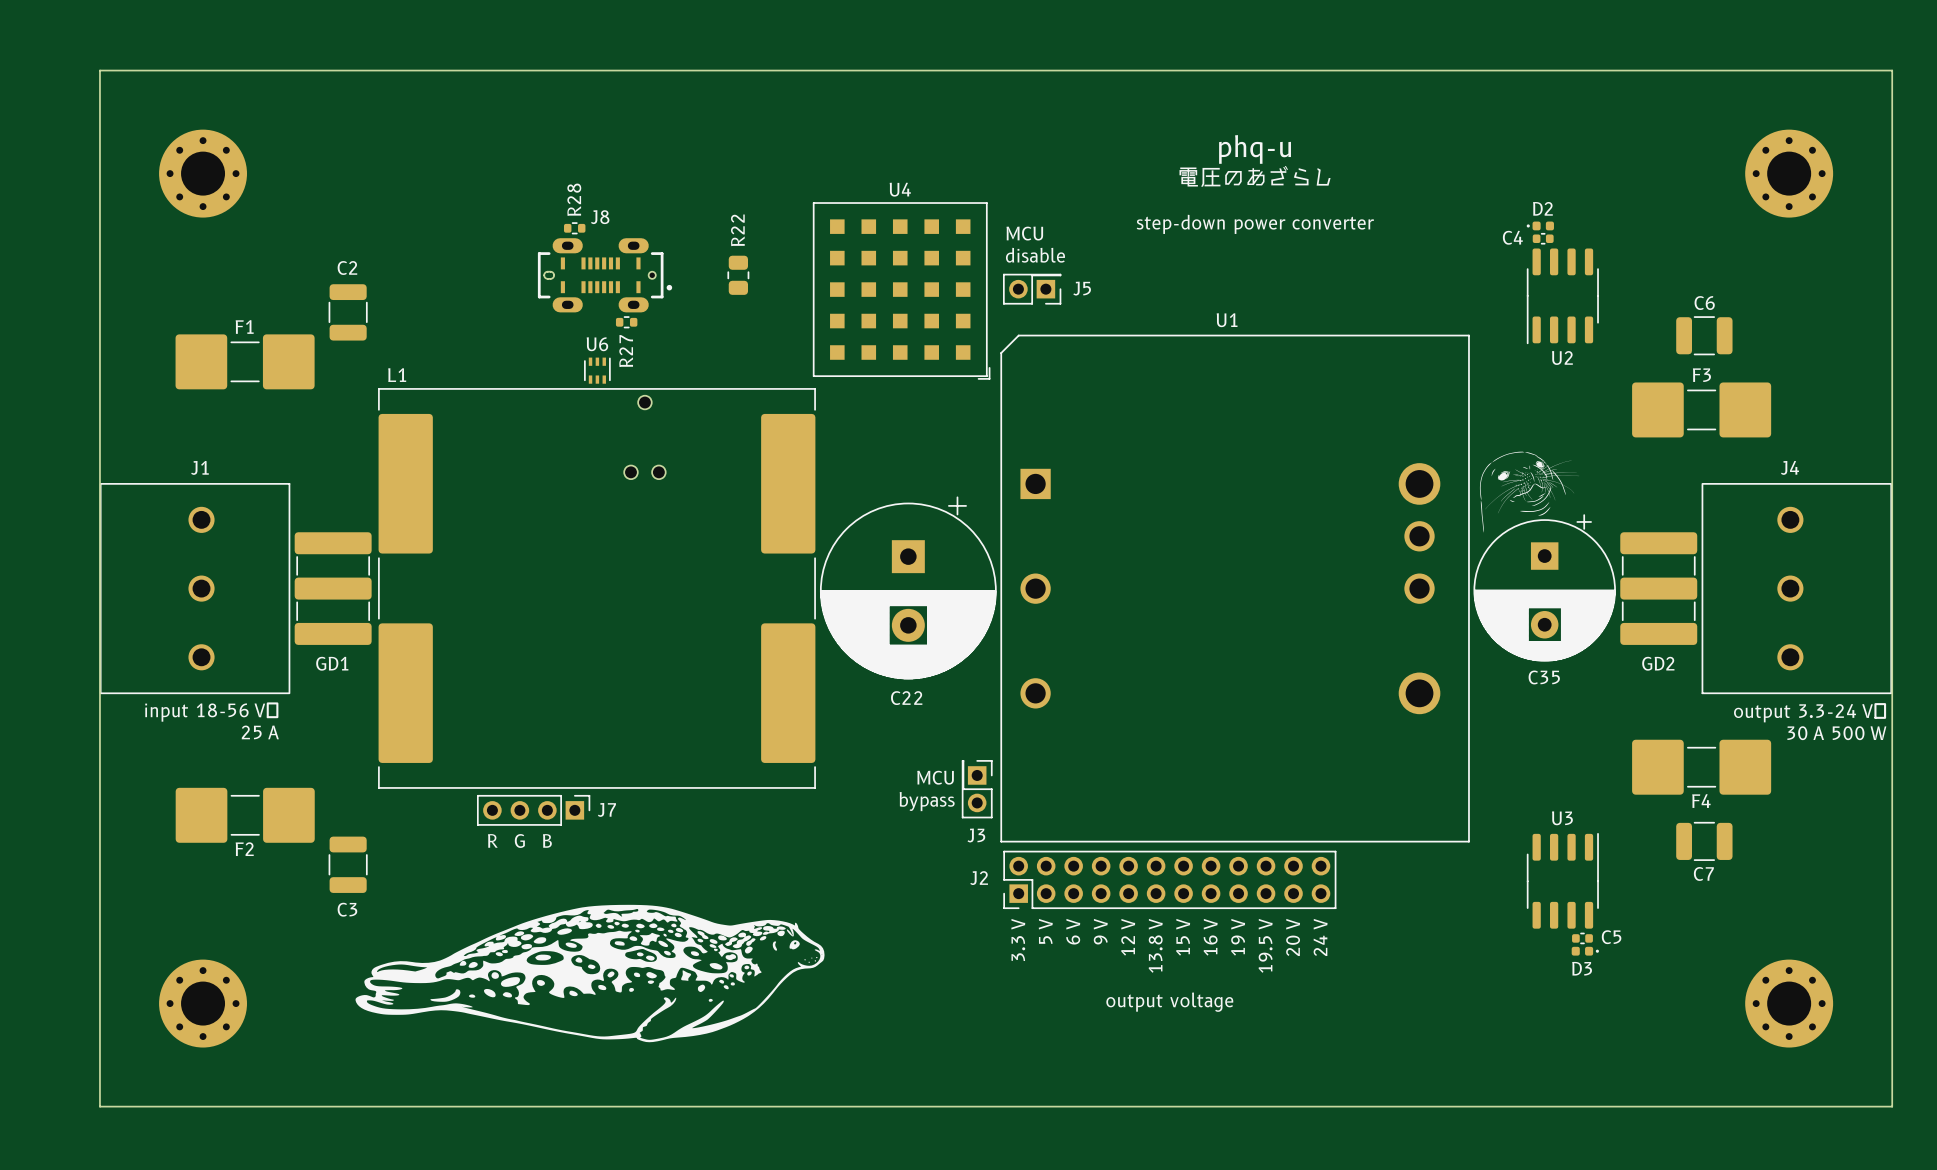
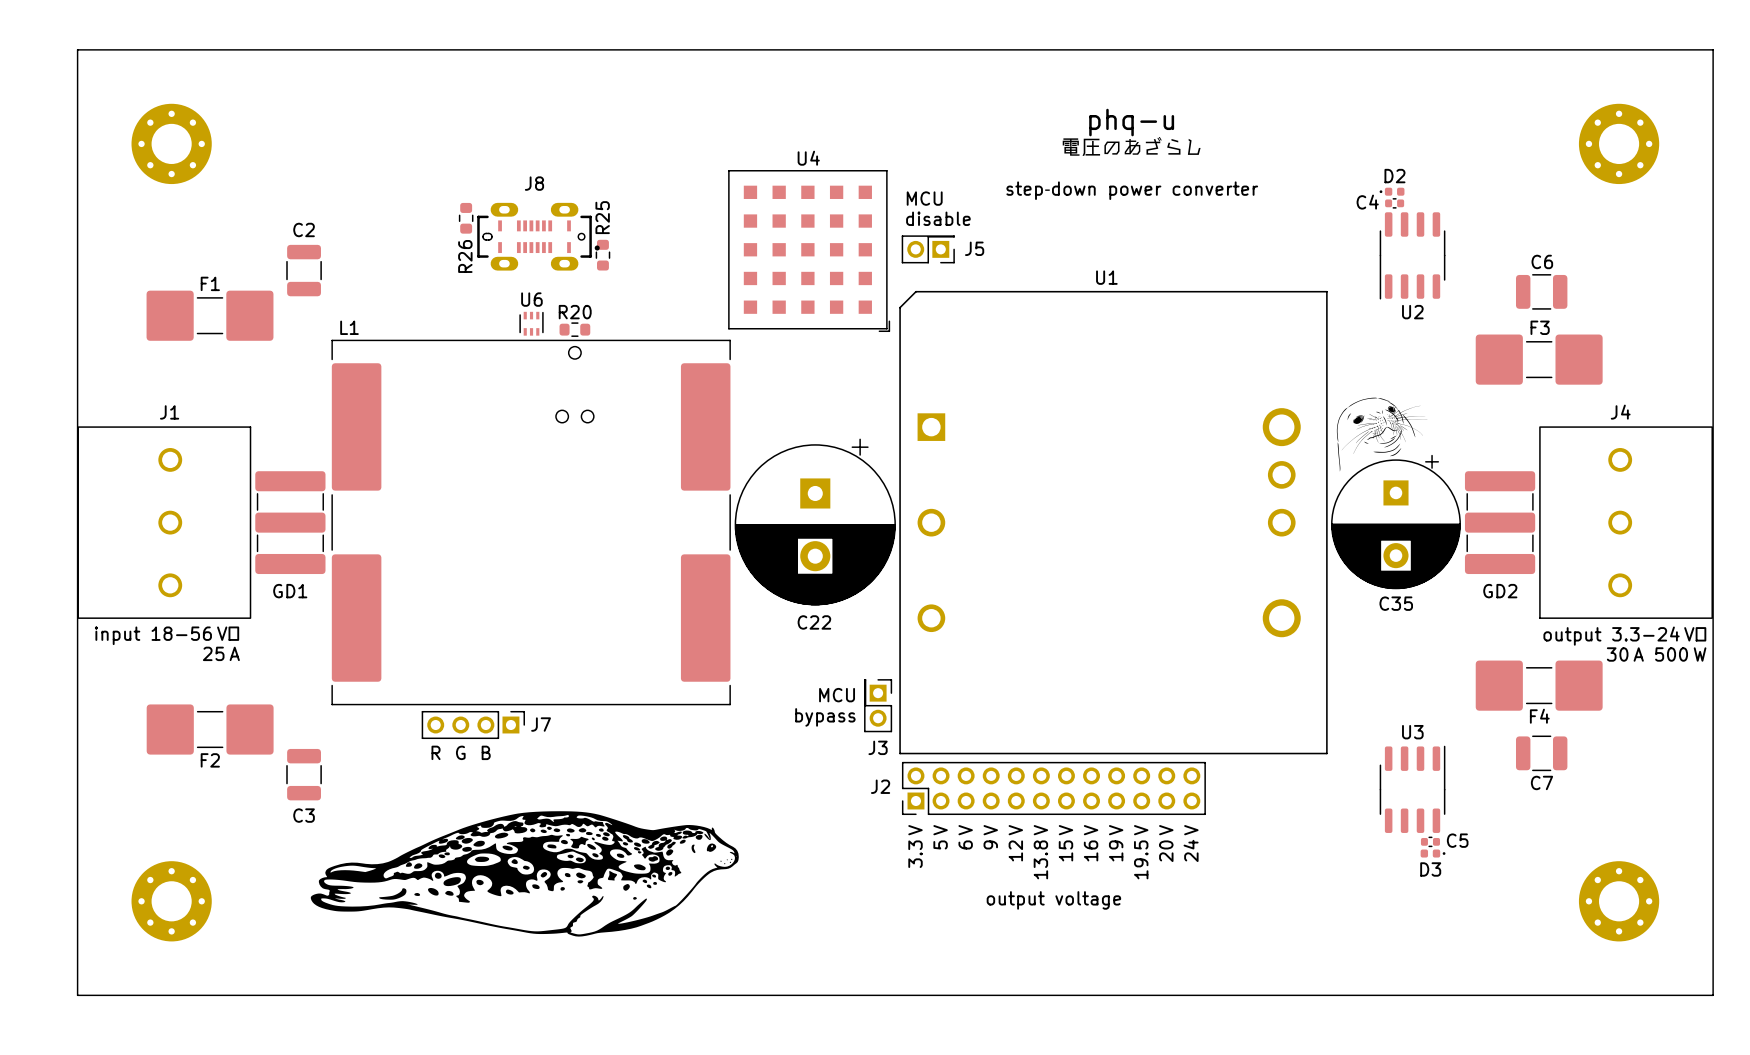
R28: (574, 228) -> none
R26: none -> (466, 218)
R22: (738, 275) -> none
R25: none -> (602, 255)
R27: (626, 322) -> none
R20: none -> (574, 329)

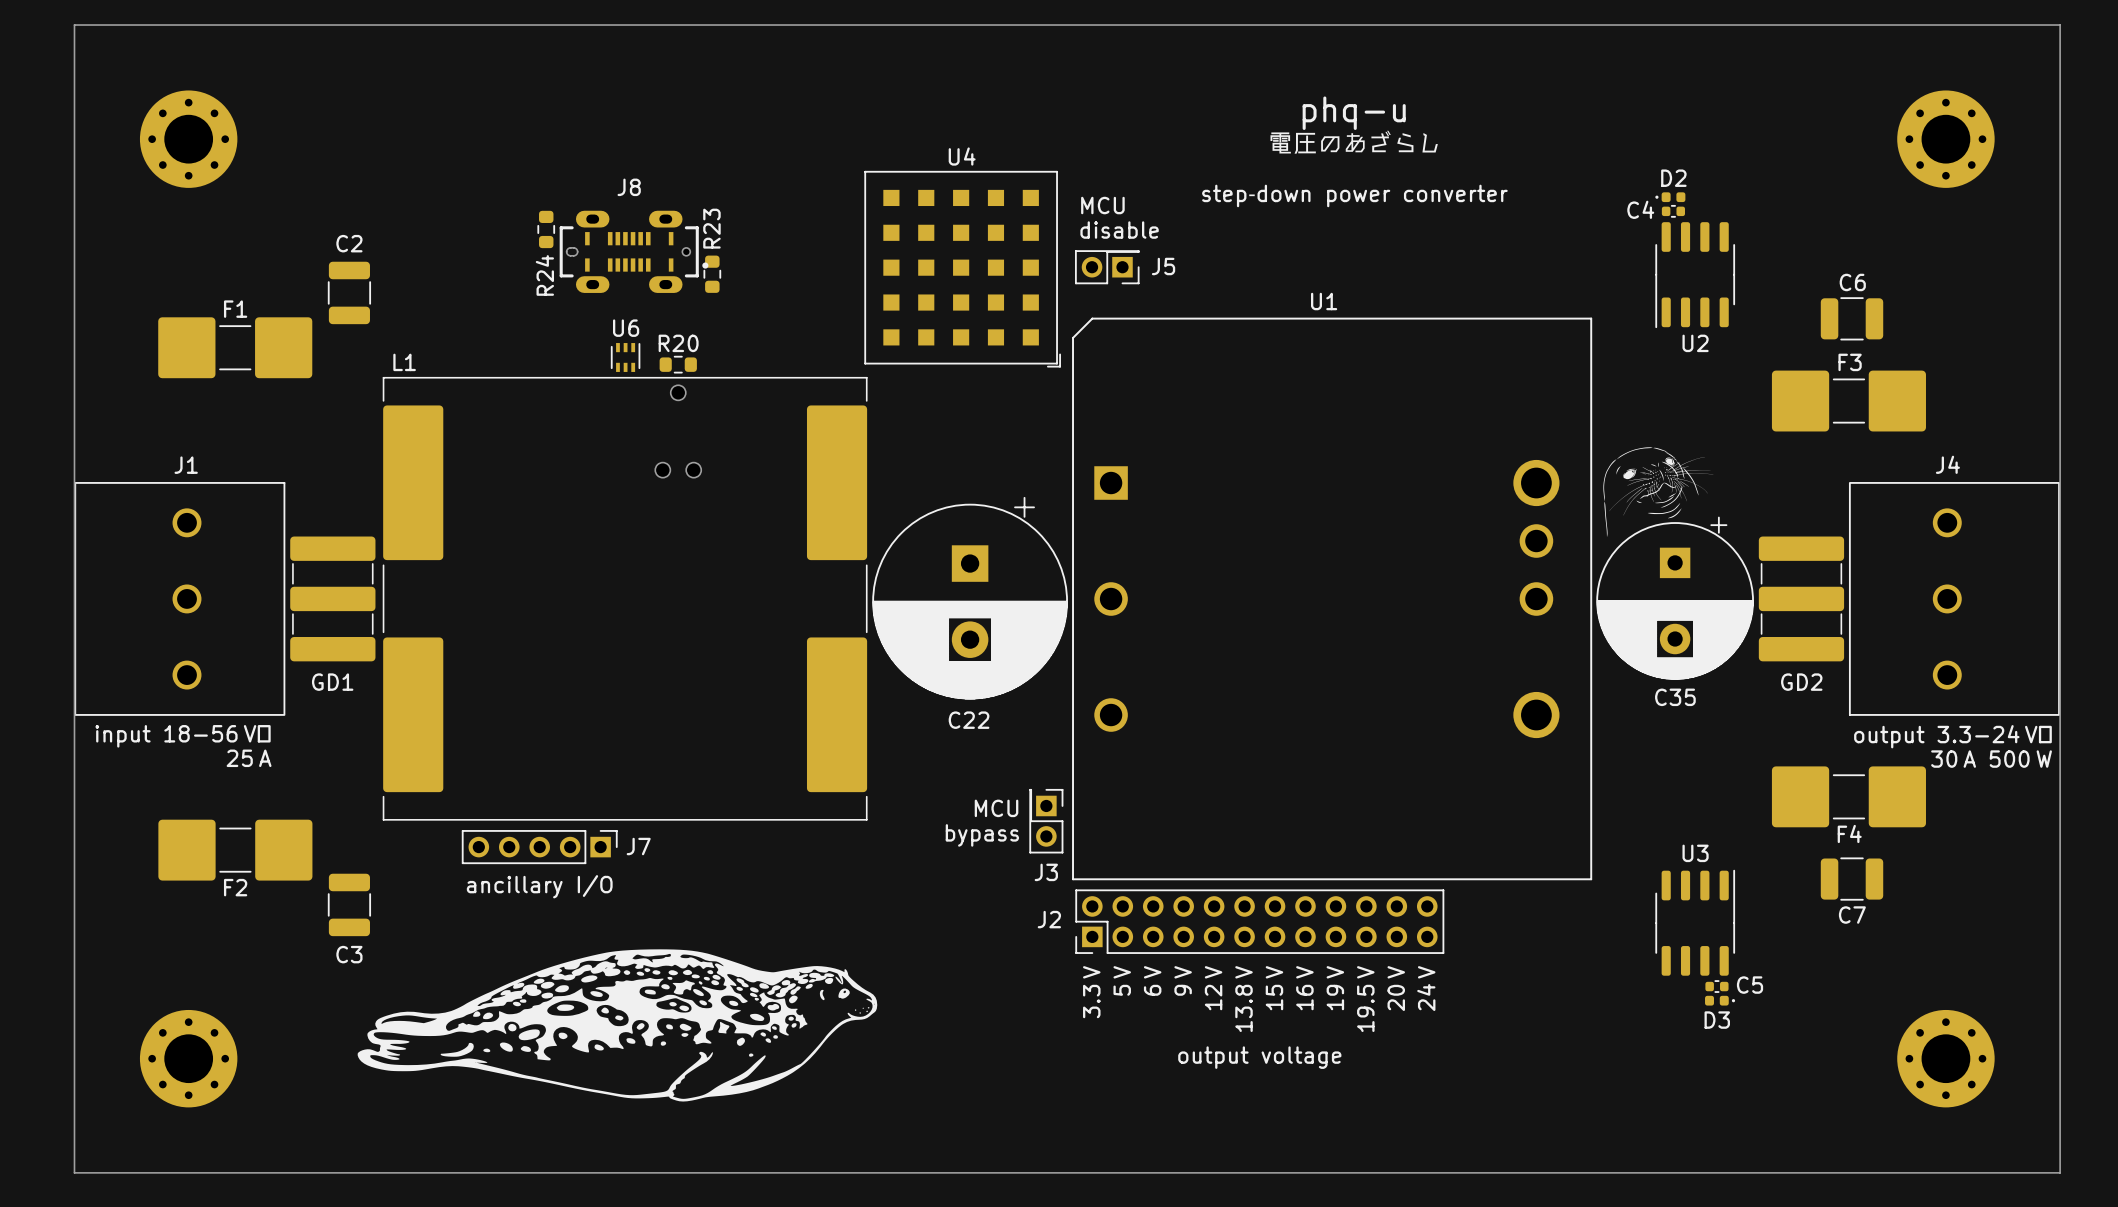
R25 name: R25 (602, 217) -> R23 (711, 228)
R26 name: R26 (465, 256) -> R24 (544, 275)
J7 footprint: [421, 710, 526, 740] -> [461, 830, 618, 865]
text: R (436, 752) -> none
text: G (460, 752) -> ancillary I/O (539, 886)
text: B (486, 752) -> none

